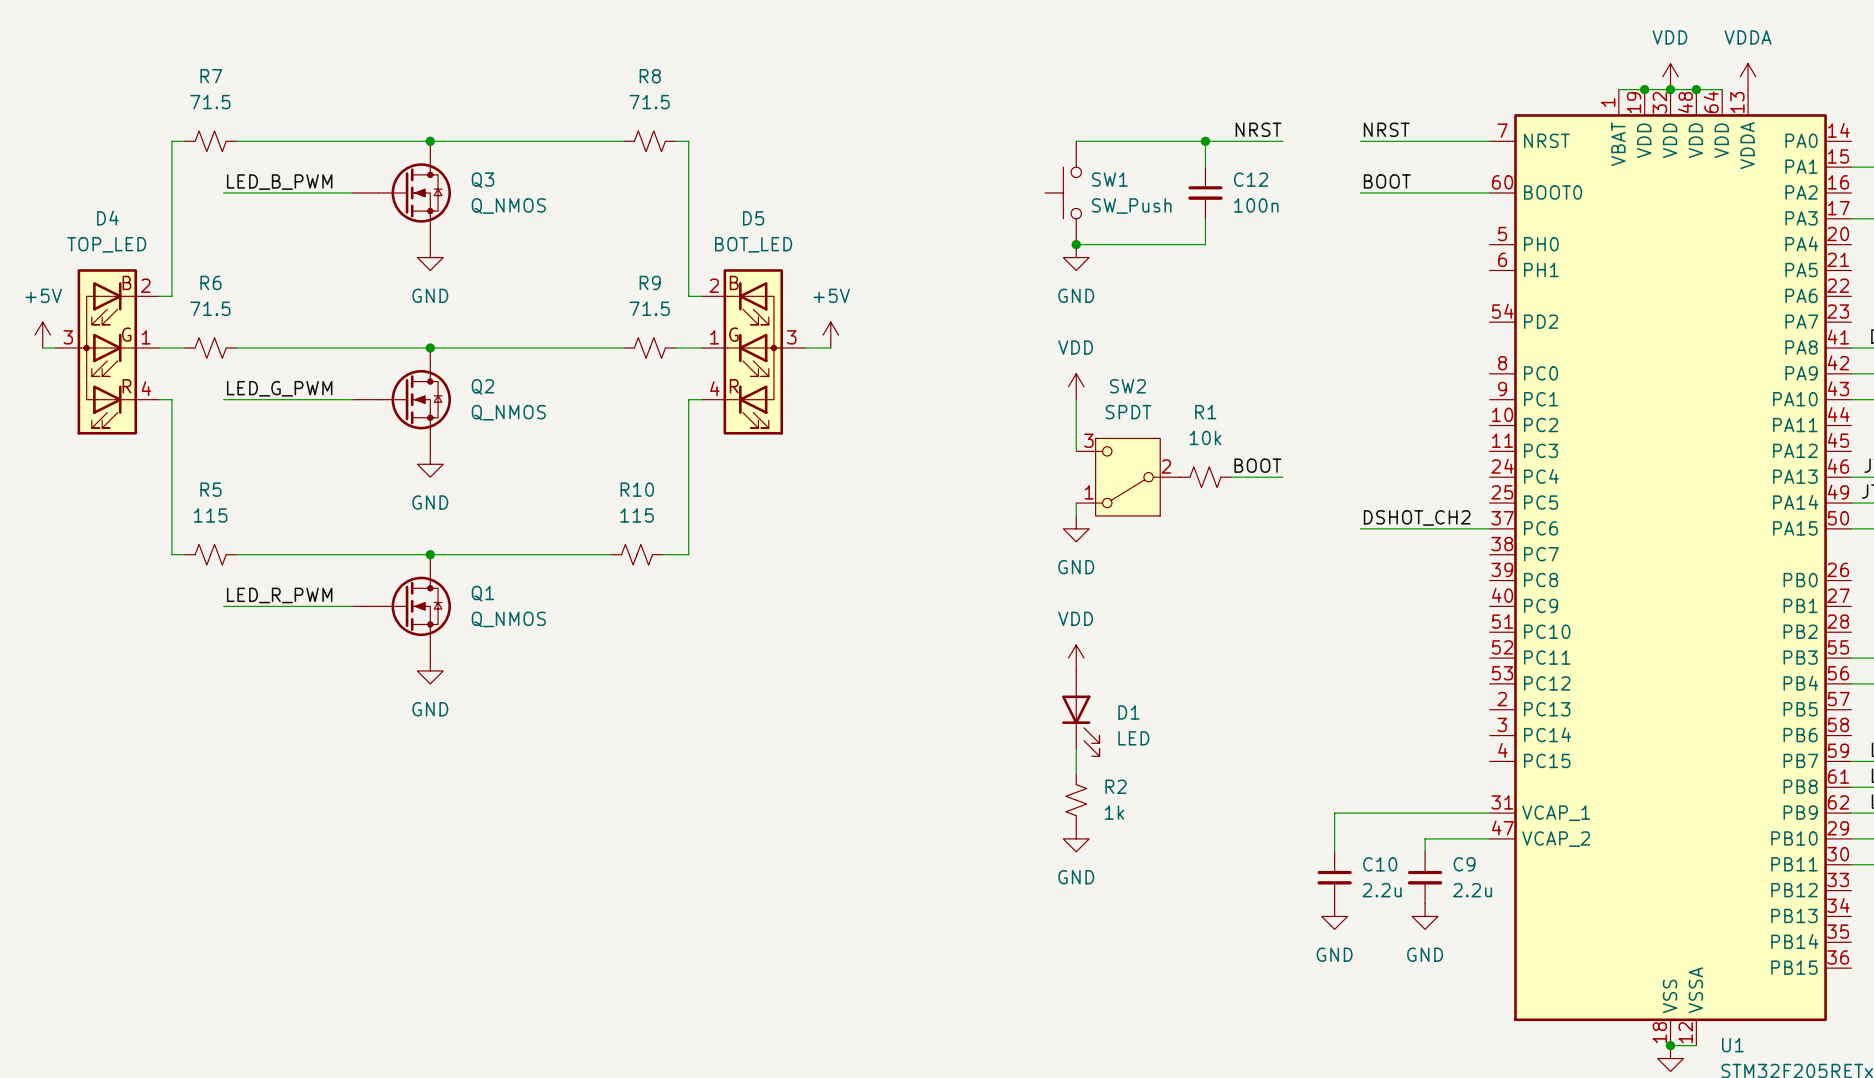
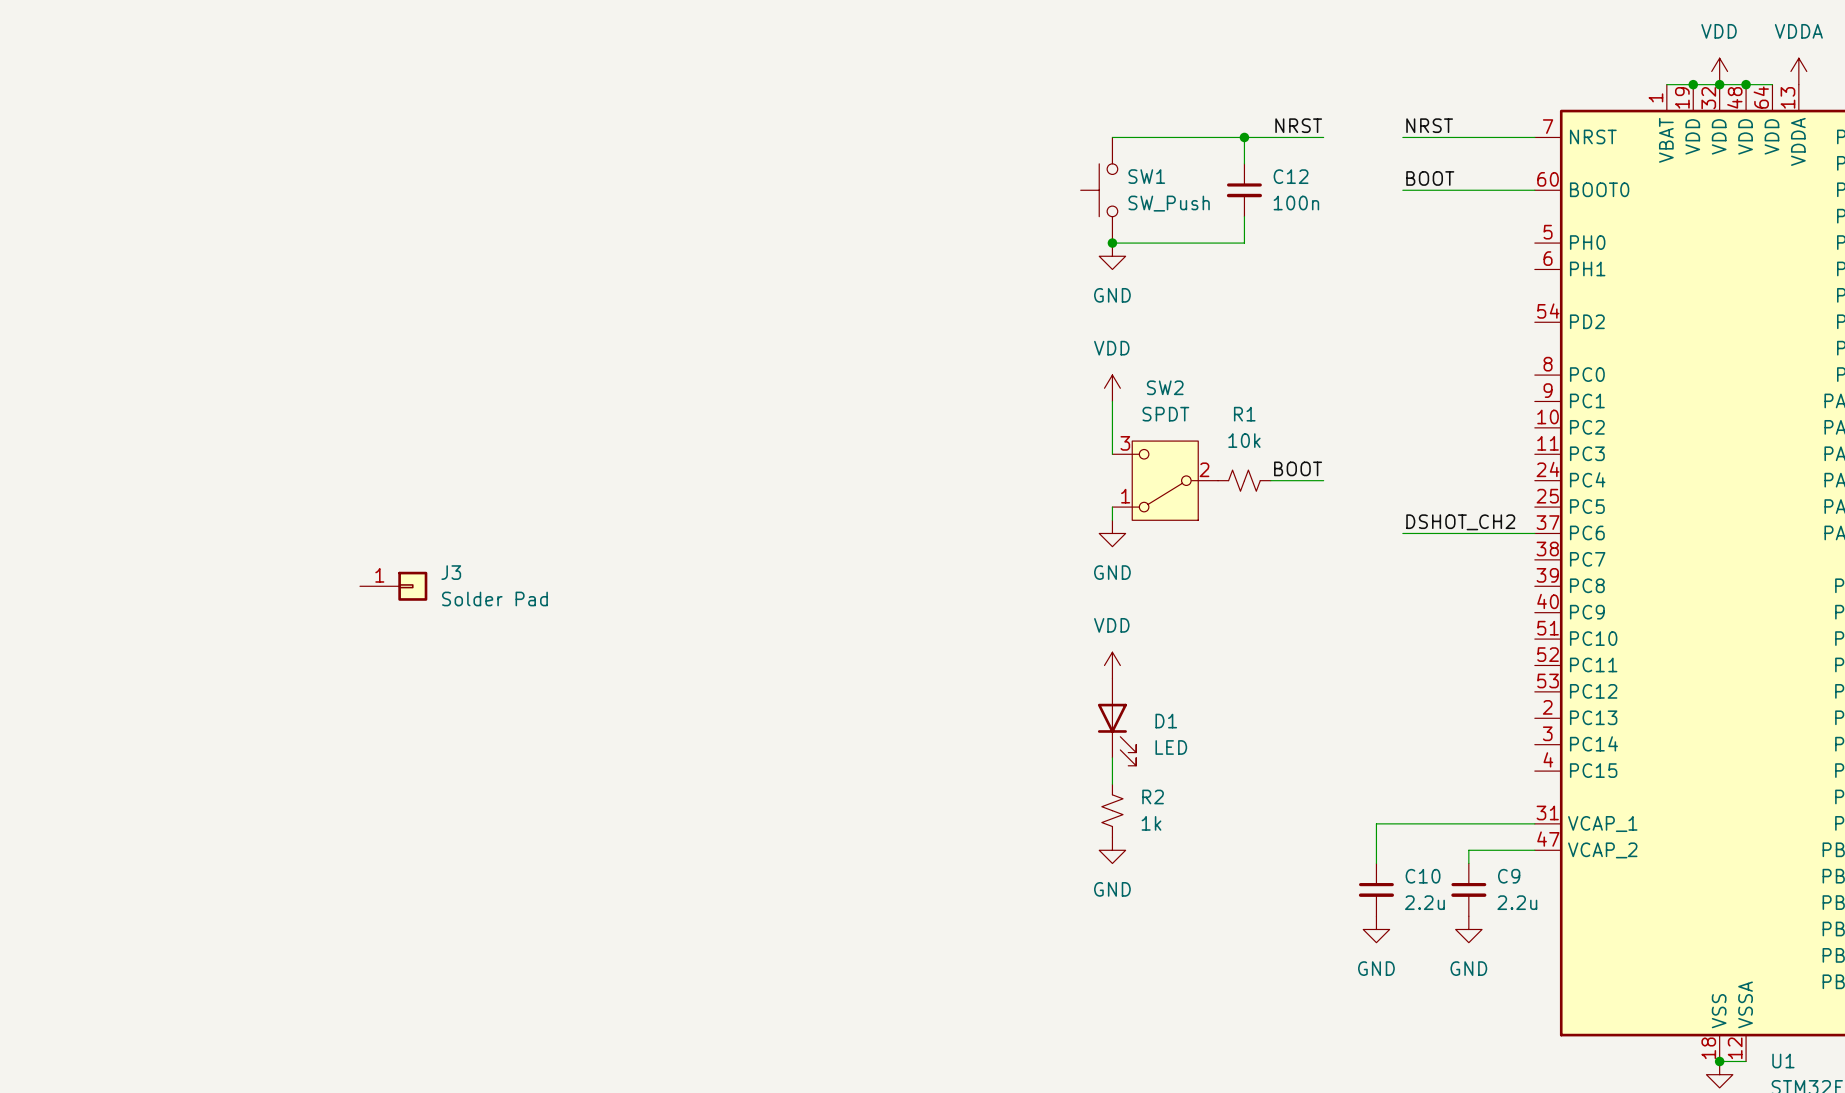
wire: (184, 141) (171, 141) (171, 296) (159, 296) -> none
R7: 71.5 (210, 141) -> none
wire: (236, 141) (624, 141) -> none
junction: (430, 141) -> none
R8: 71.5 (649, 141) -> none
wire: (675, 141) (688, 141) (688, 296) (701, 296) -> none
label: LED_B_PWM (279, 182) -> none
wire: (223, 192) (352, 192) -> none
Q3: Q_NMOS (401, 192) -> none
power symbol: GND (430, 257) -> none
power symbol: +5V (42, 335) -> none
power symbol: +5V (830, 335) -> none
wire: (42, 348) (55, 348) -> none
wire: (159, 348) (184, 348) -> none
R6: 71.5 (210, 348) -> none
wire: (236, 348) (624, 348) -> none
junction: (430, 348) -> none
R9: 71.5 (649, 348) -> none
wire: (675, 348) (701, 348) -> none
wire: (804, 348) (830, 348) -> none
D4: TOP_LED (107, 351) -> none
D5: BOT_LED (753, 351) -> none
label: LED_G_PWM (279, 388) -> none
wire: (159, 399) (171, 399) (171, 554) (184, 554) -> none
wire: (223, 399) (352, 399) -> none
Q2: Q_NMOS (401, 399) -> none
wire: (701, 399) (688, 399) (688, 554) (662, 554) -> none
power symbol: GND (430, 464) -> none
R5: 115 (210, 554) -> none
wire: (236, 554) (611, 554) -> none
junction: (430, 554) -> none
R10: 115 (637, 554) -> none
J3: none -> Solder Pad (393, 586)
label: LED_R_PWM (279, 595) -> none
wire: (223, 606) (352, 606) -> none
Q1: Q_NMOS (401, 606) -> none
power symbol: GND (430, 670) -> none

